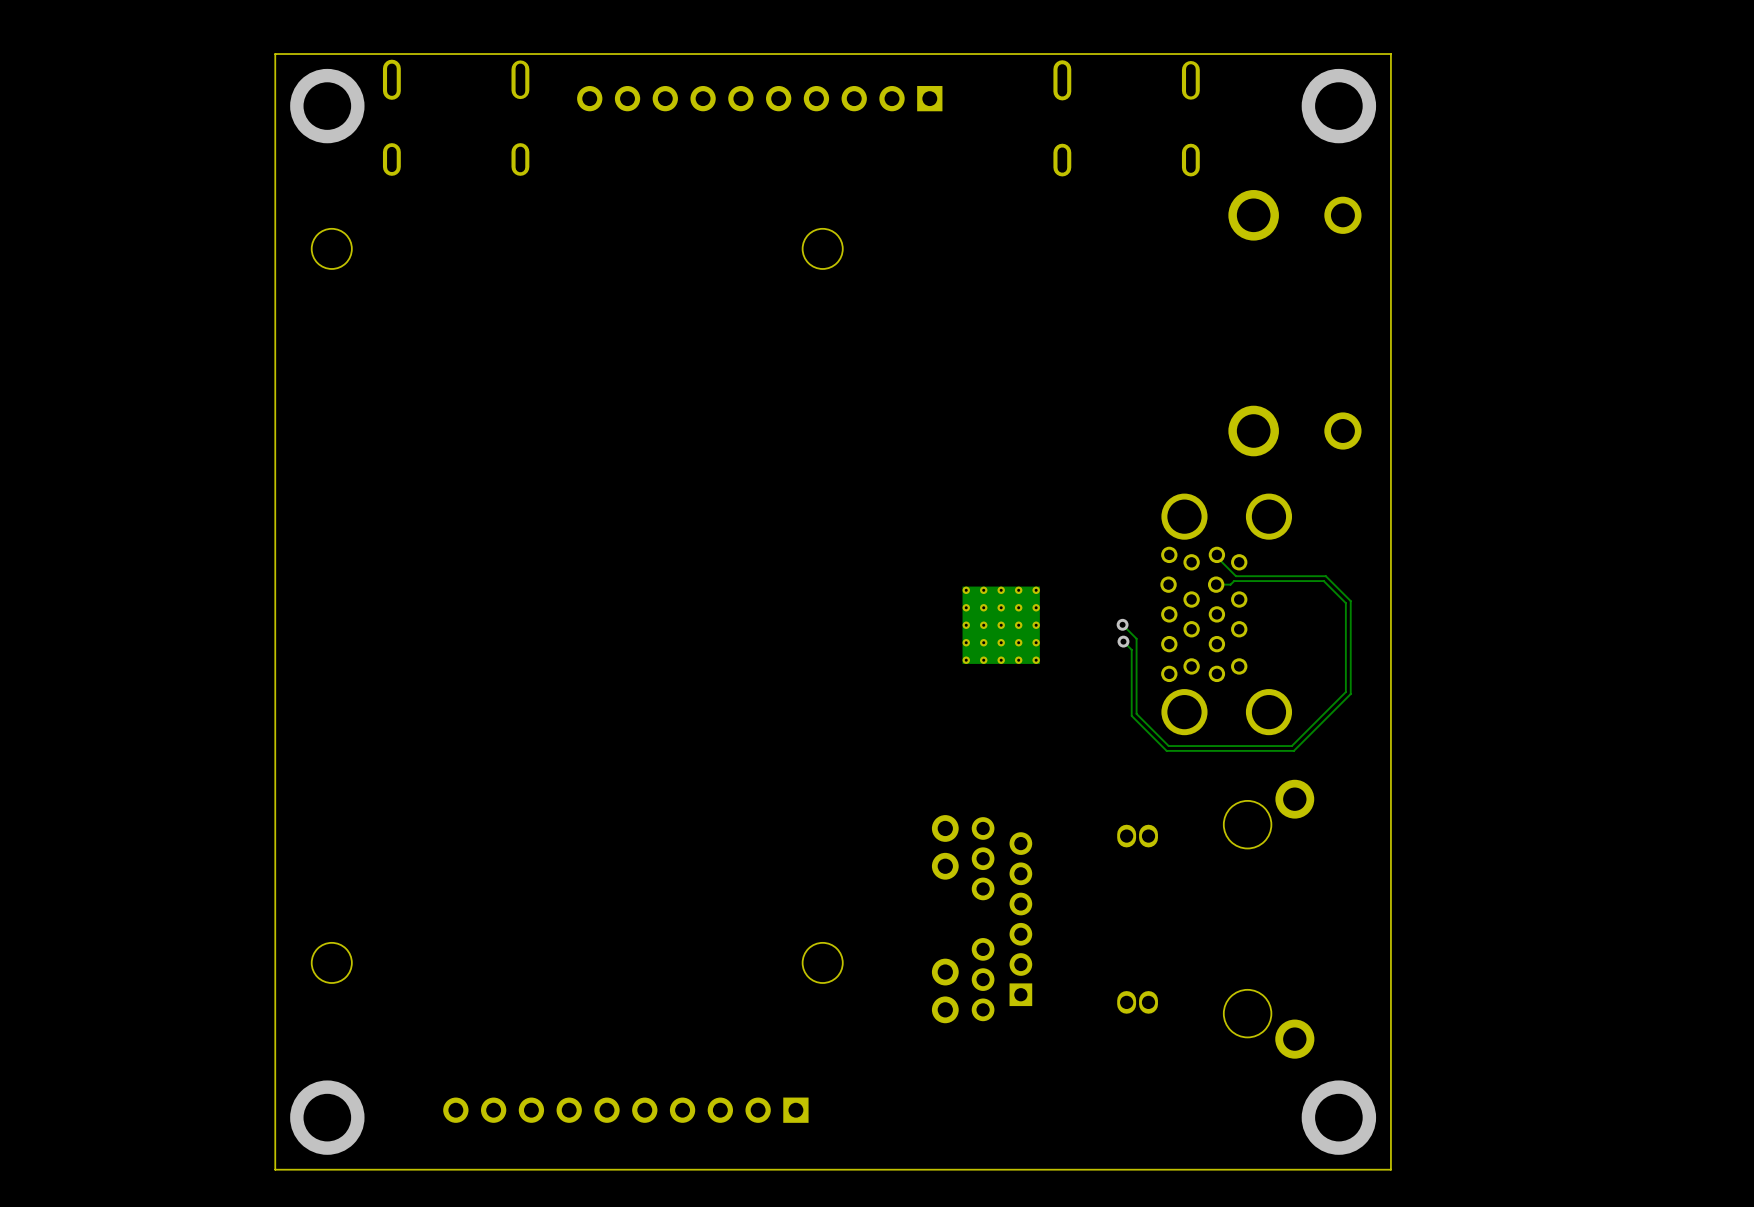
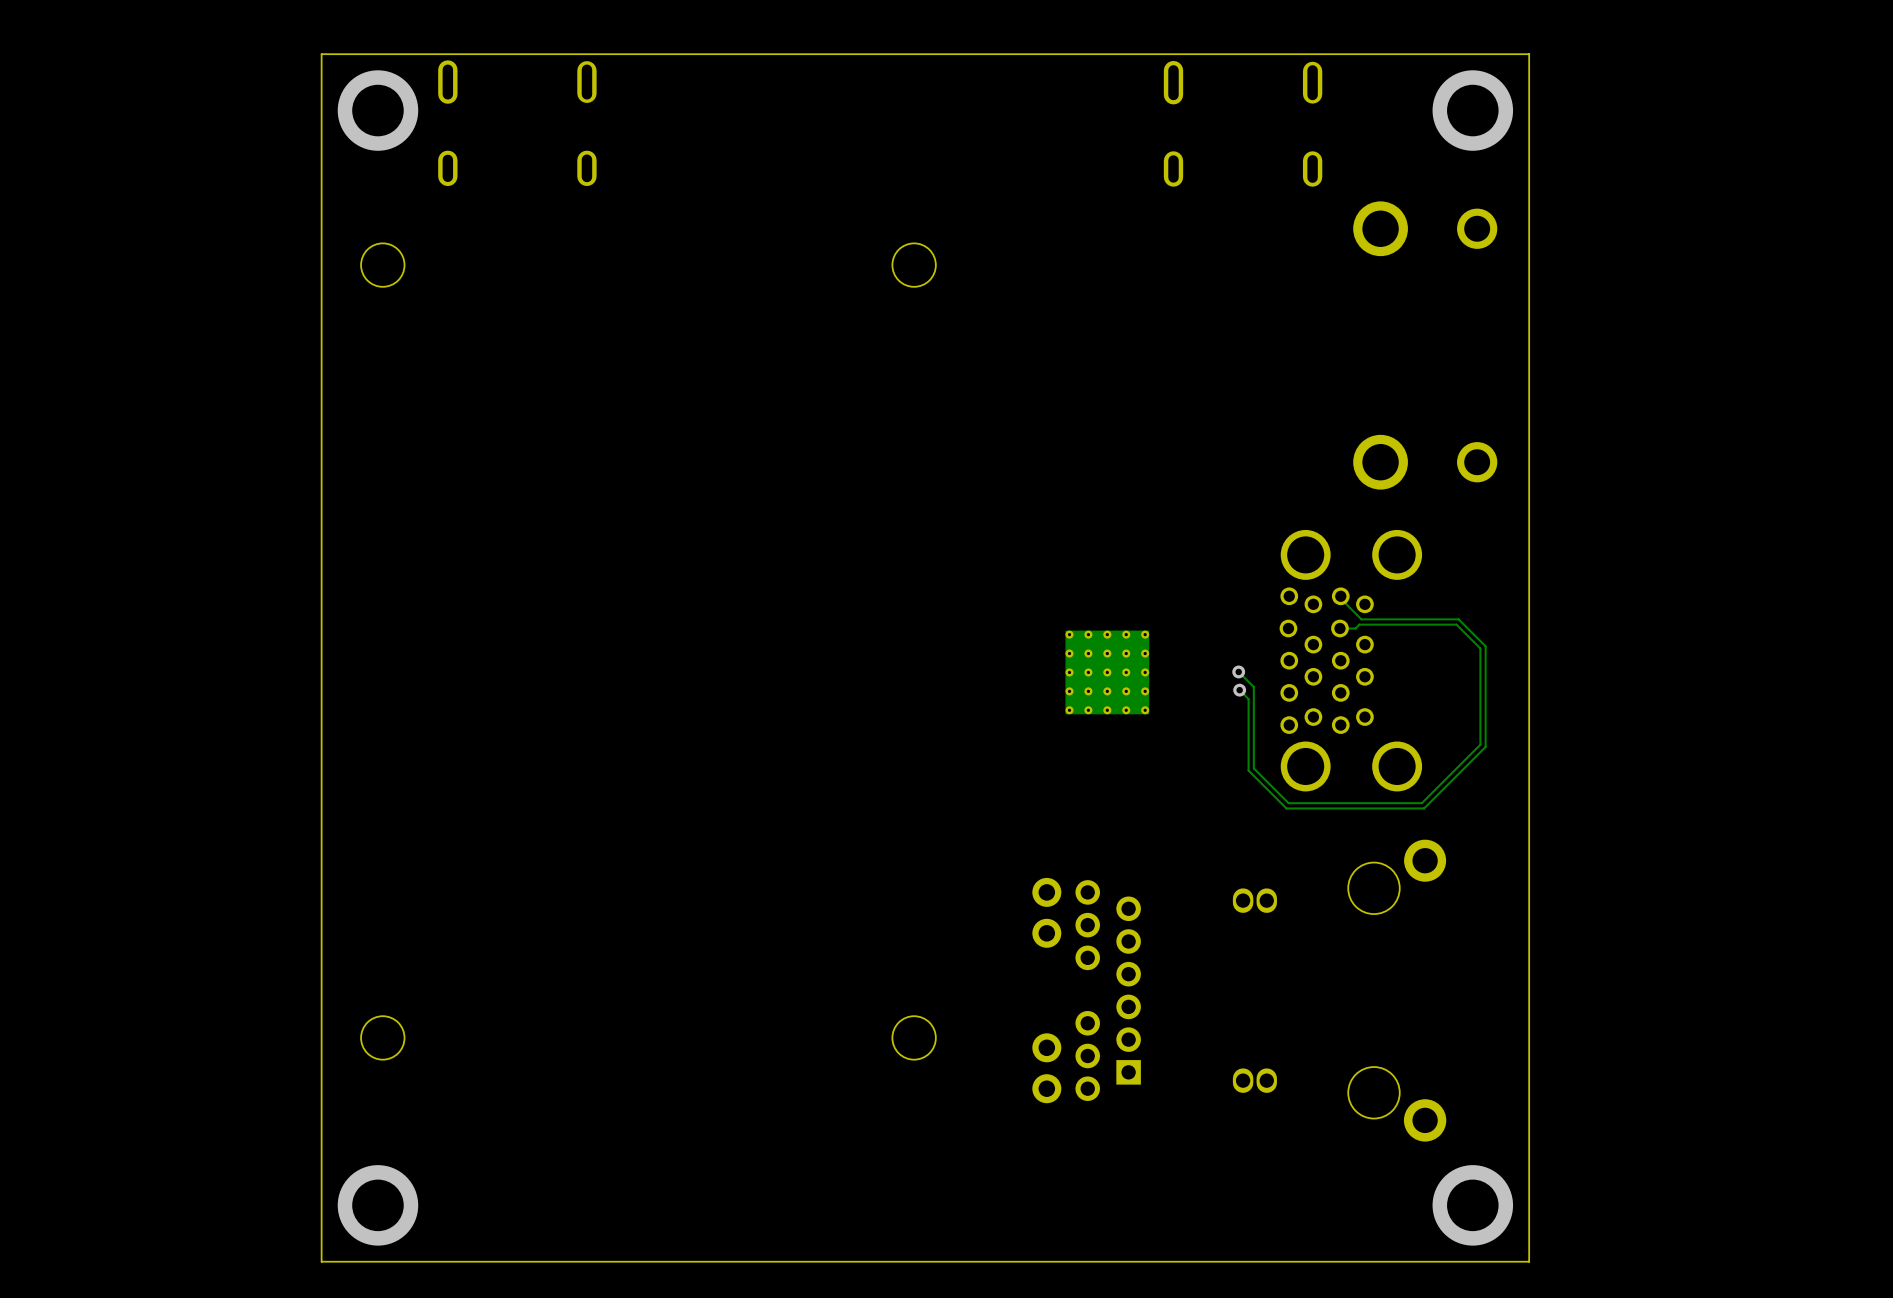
part: (759, 98) -> none
part: (625, 1110) -> none

